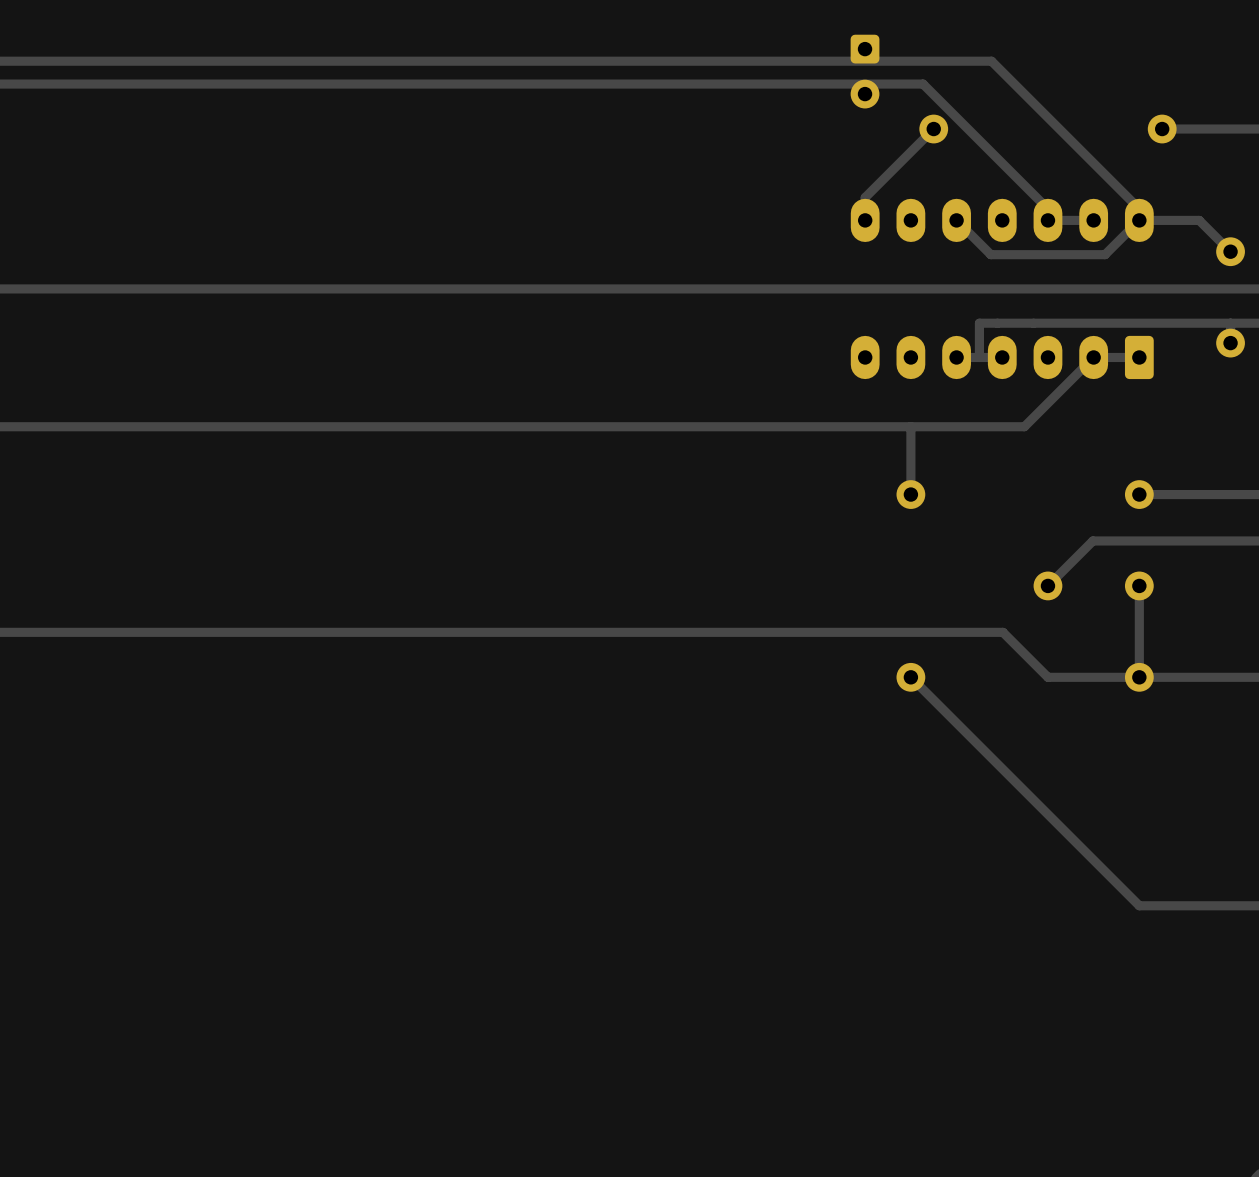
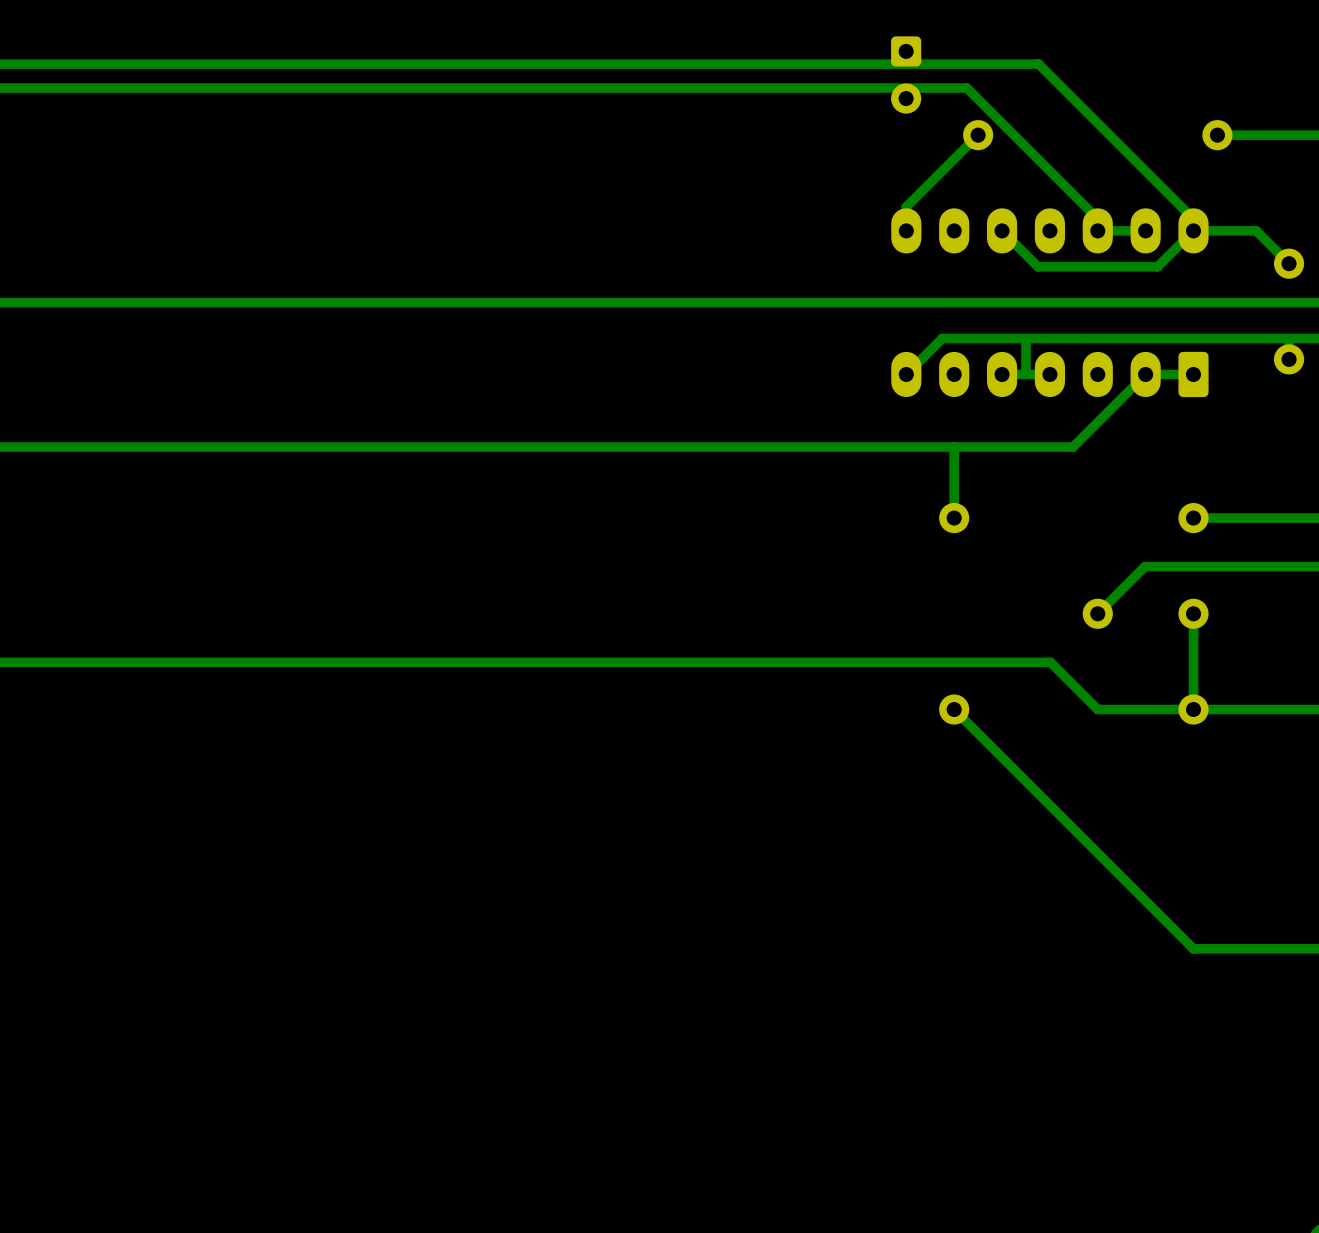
track: none -> (1025, 338) (942, 338) (906, 374)

